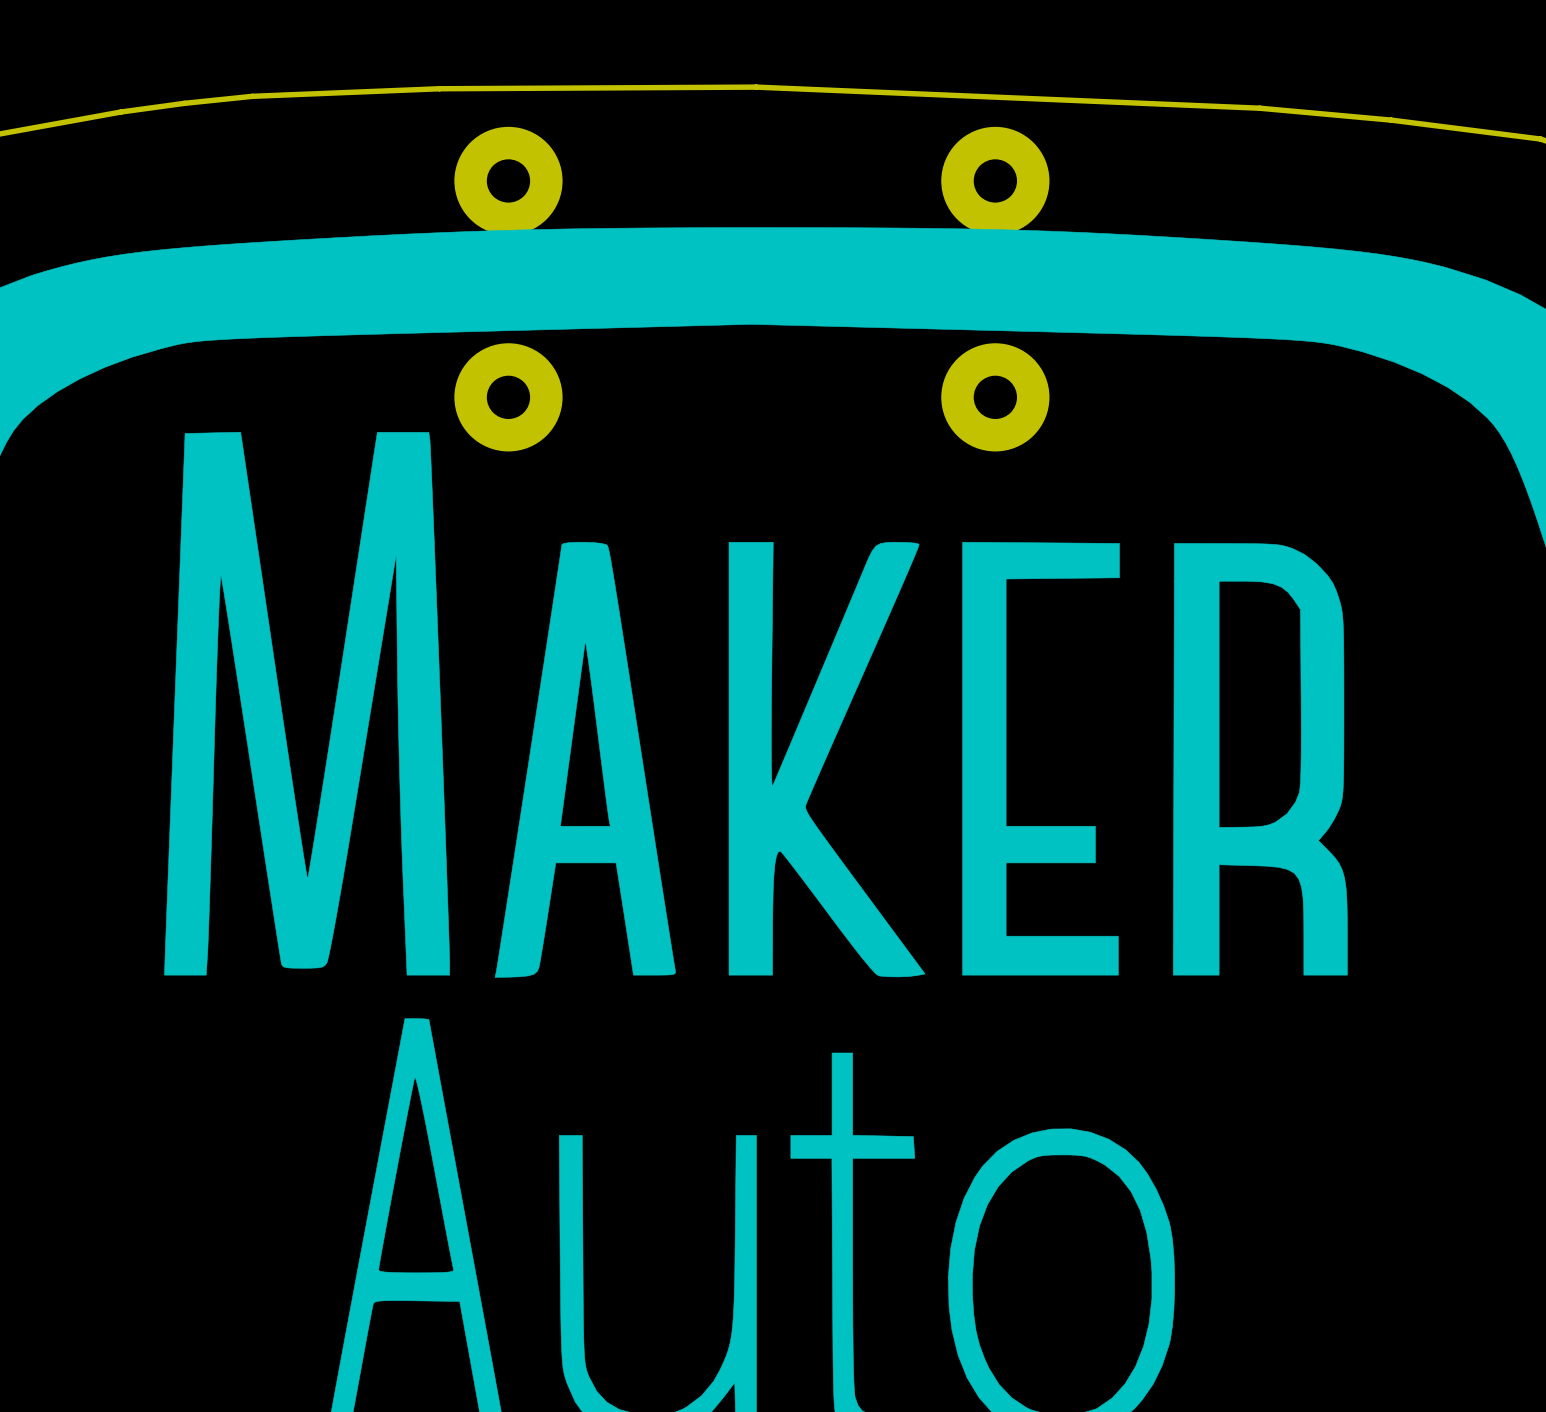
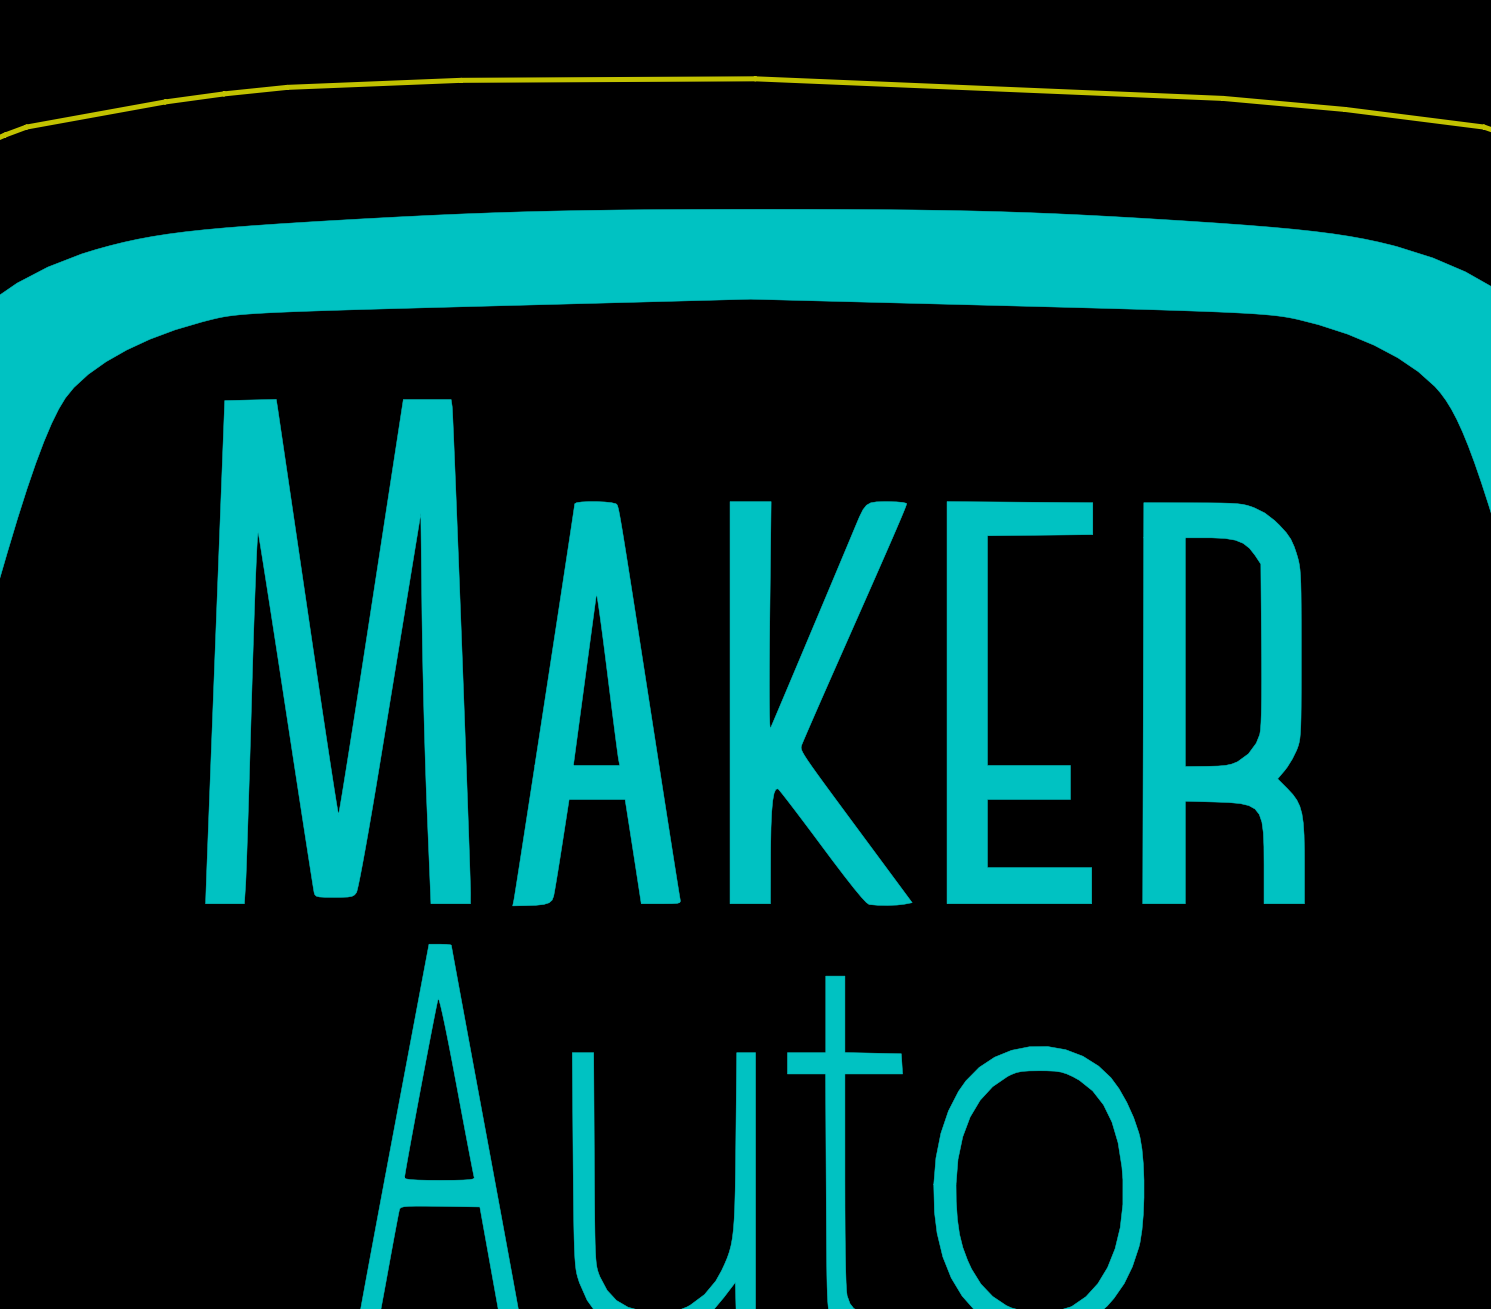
part: (508, 180) -> none
part: (995, 180) -> none
part: (508, 397) -> none
part: (995, 397) -> none

